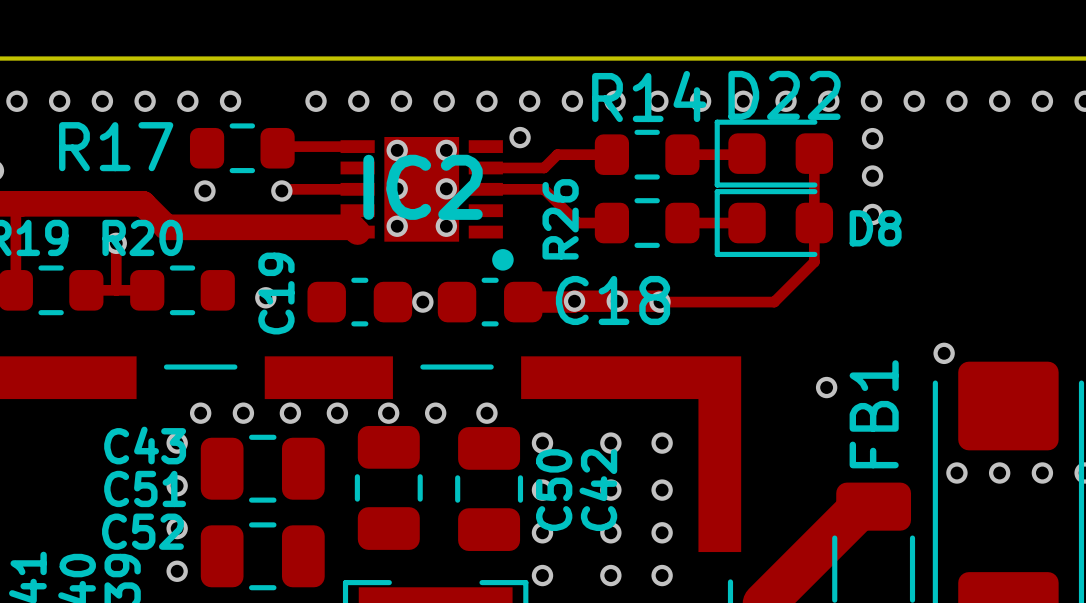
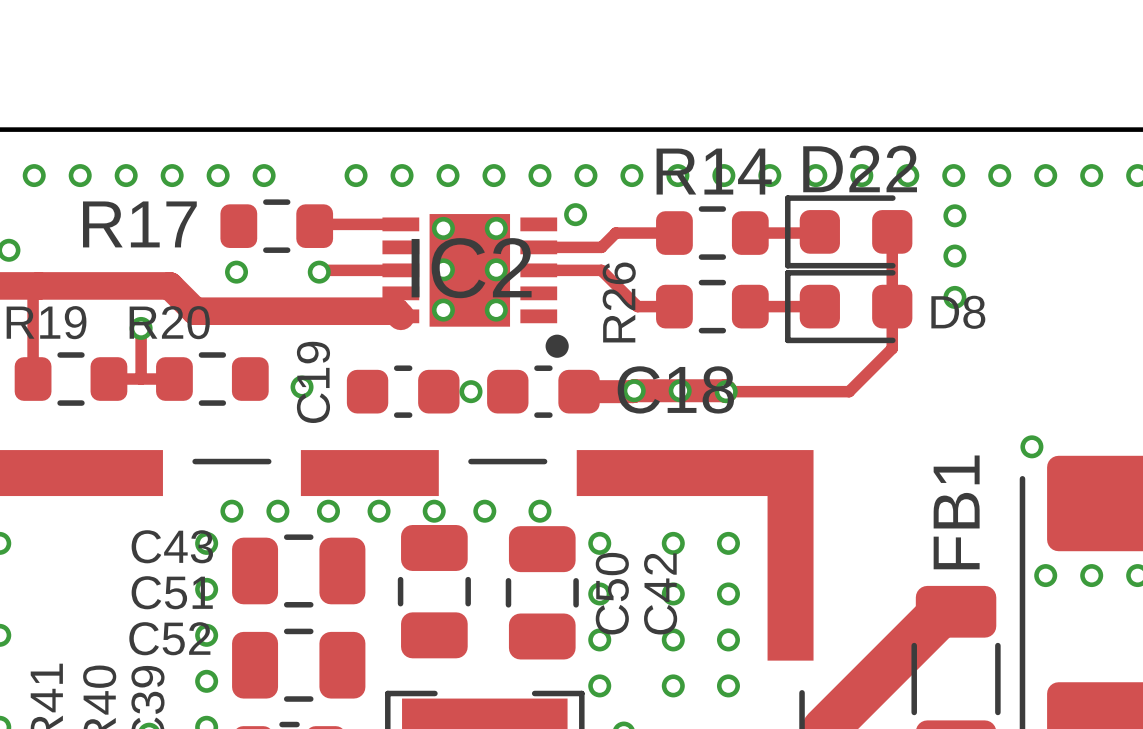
via: (826, 387) -> none

